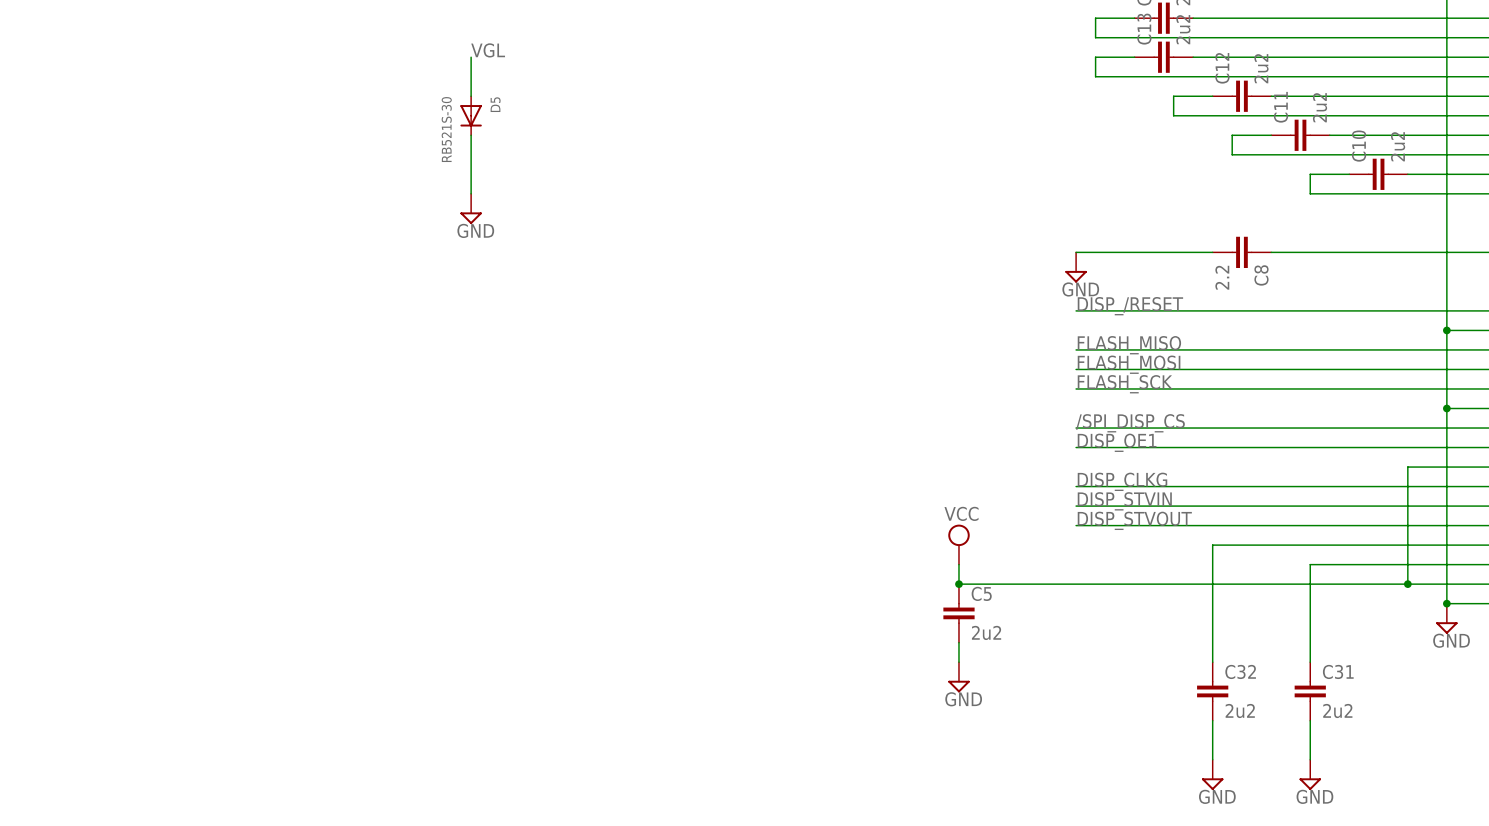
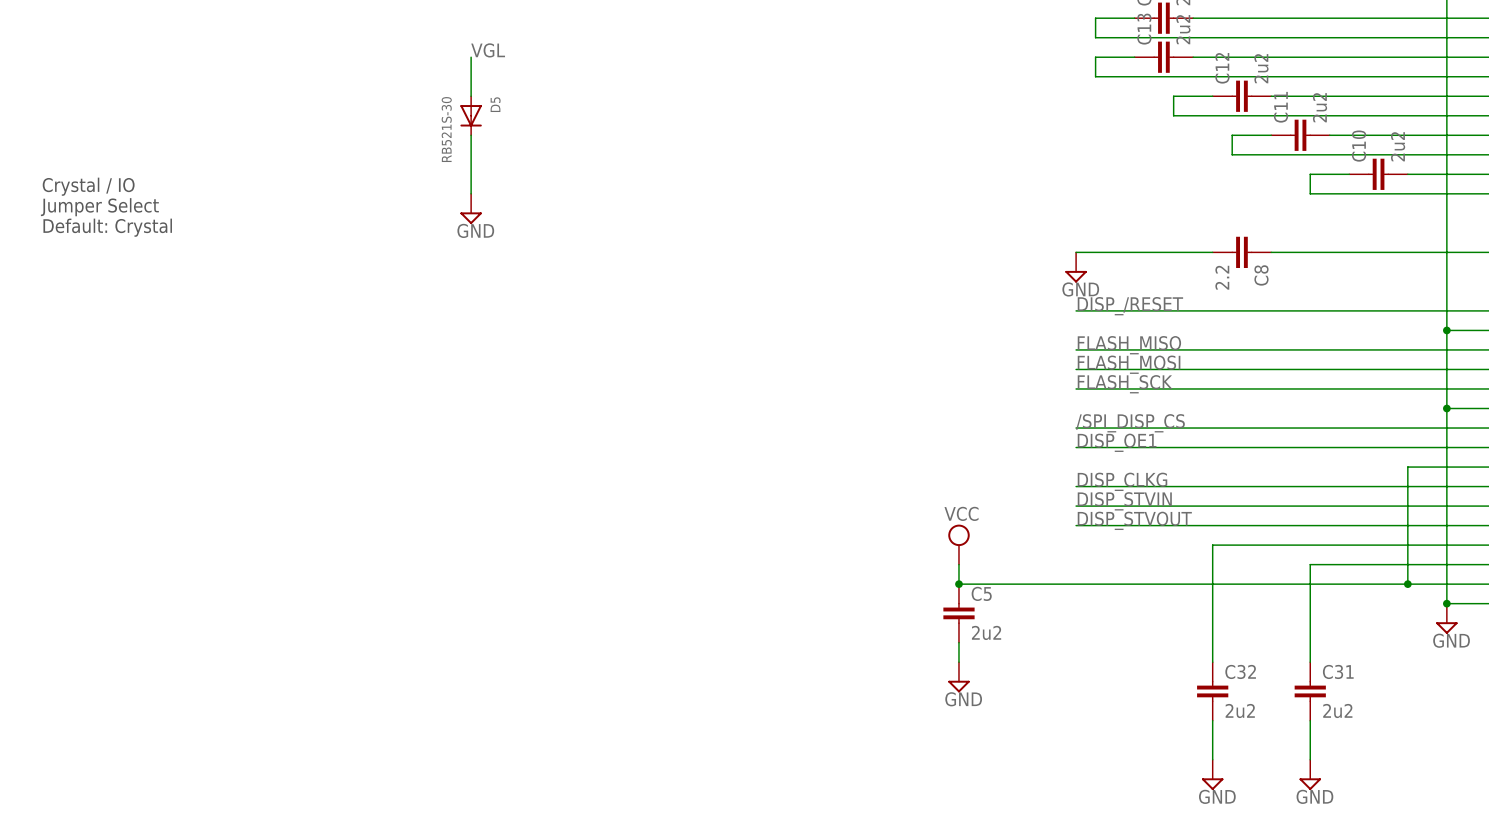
text: none -> Crystal / IO (88, 186)
text: none -> Jumper Select (99, 207)
text: none -> Default: Crystal (107, 227)

